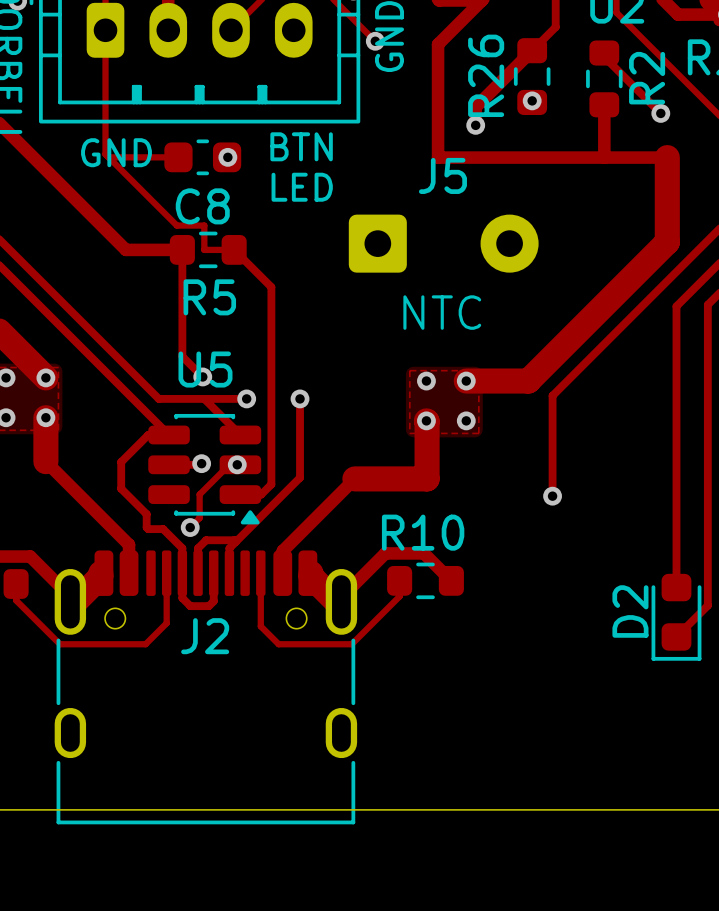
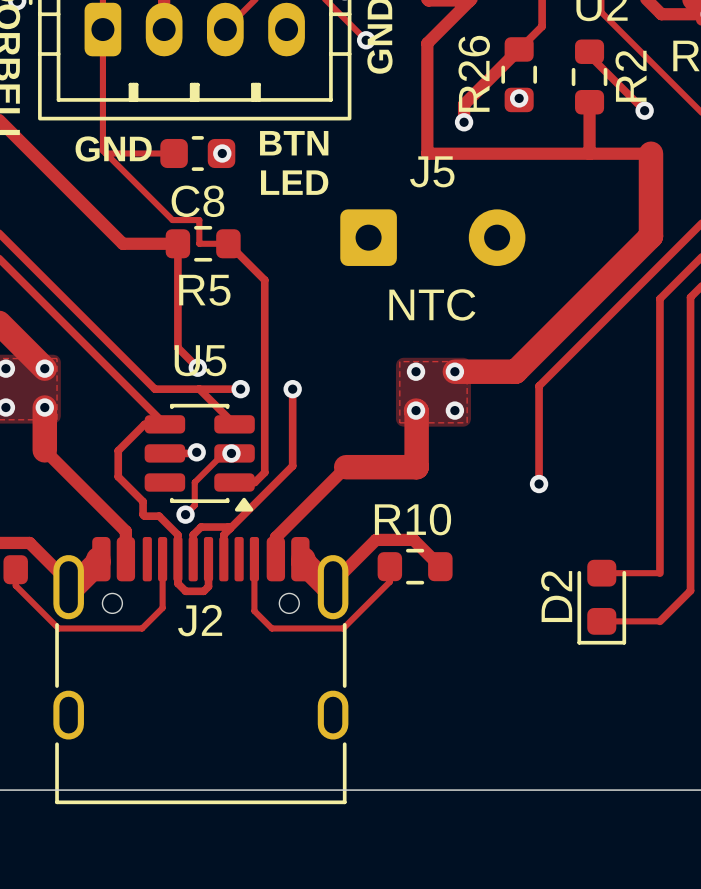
track: none -> (601, 573) (659, 573)
D2 position: (676, 617) -> (601, 602)
track: none -> (601, 621) (659, 621)

